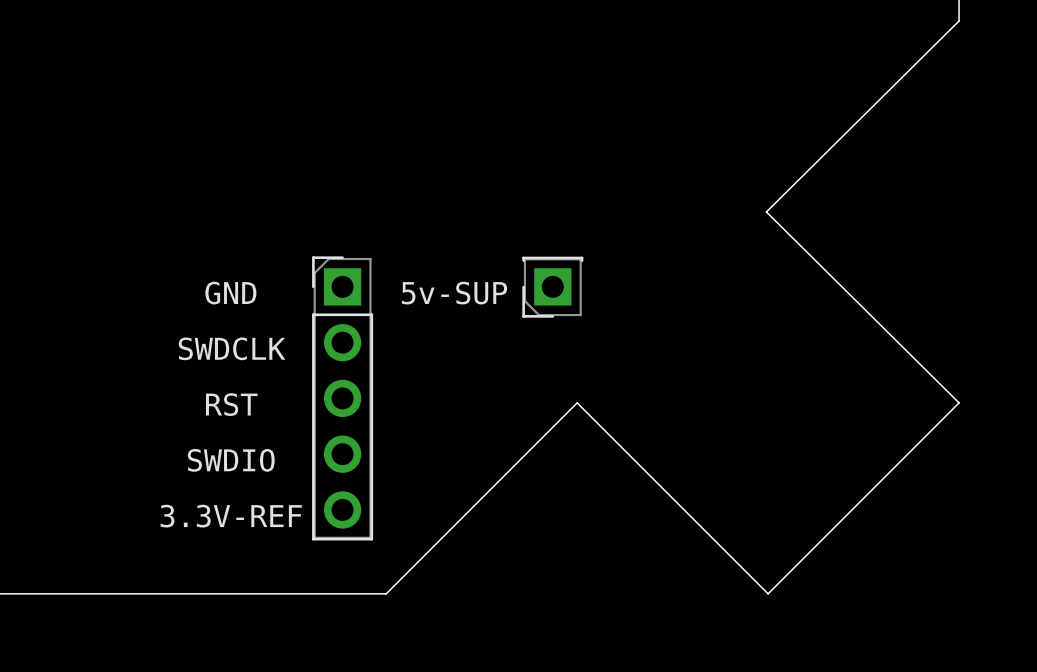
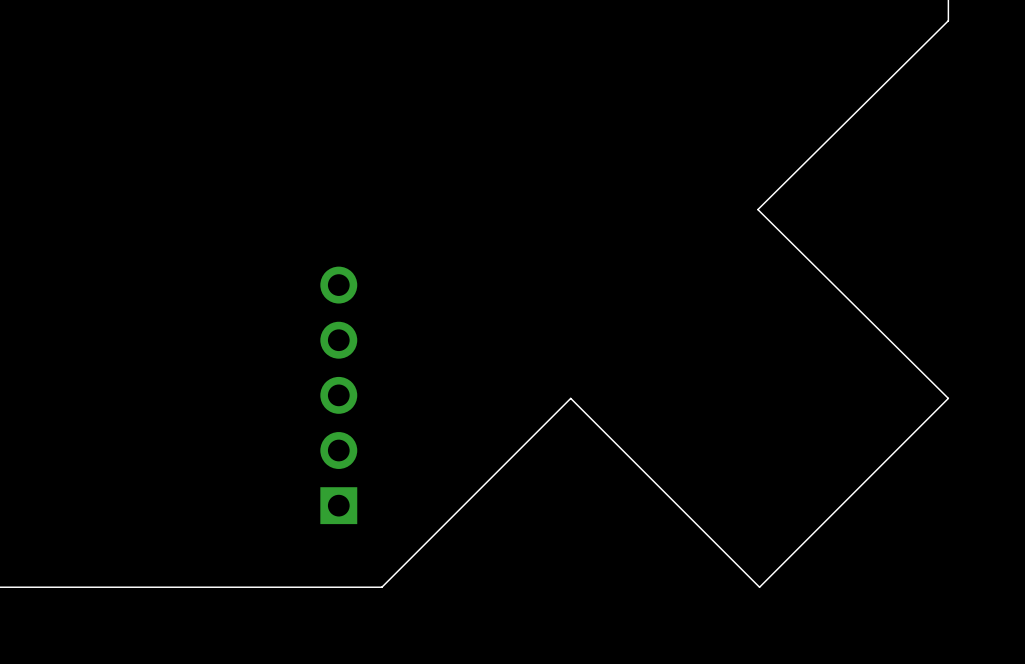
part: (552, 287) -> none
text: GND (230, 293) -> none
text: 5v-SUP (454, 293) -> none
text: SWDCLK (232, 348) -> none
part side: bottom (342, 398) -> top (338, 395)
text: RST (231, 404) -> none
text: SWDIO (231, 460) -> none
text: 3.3V-REF (231, 516) -> none

